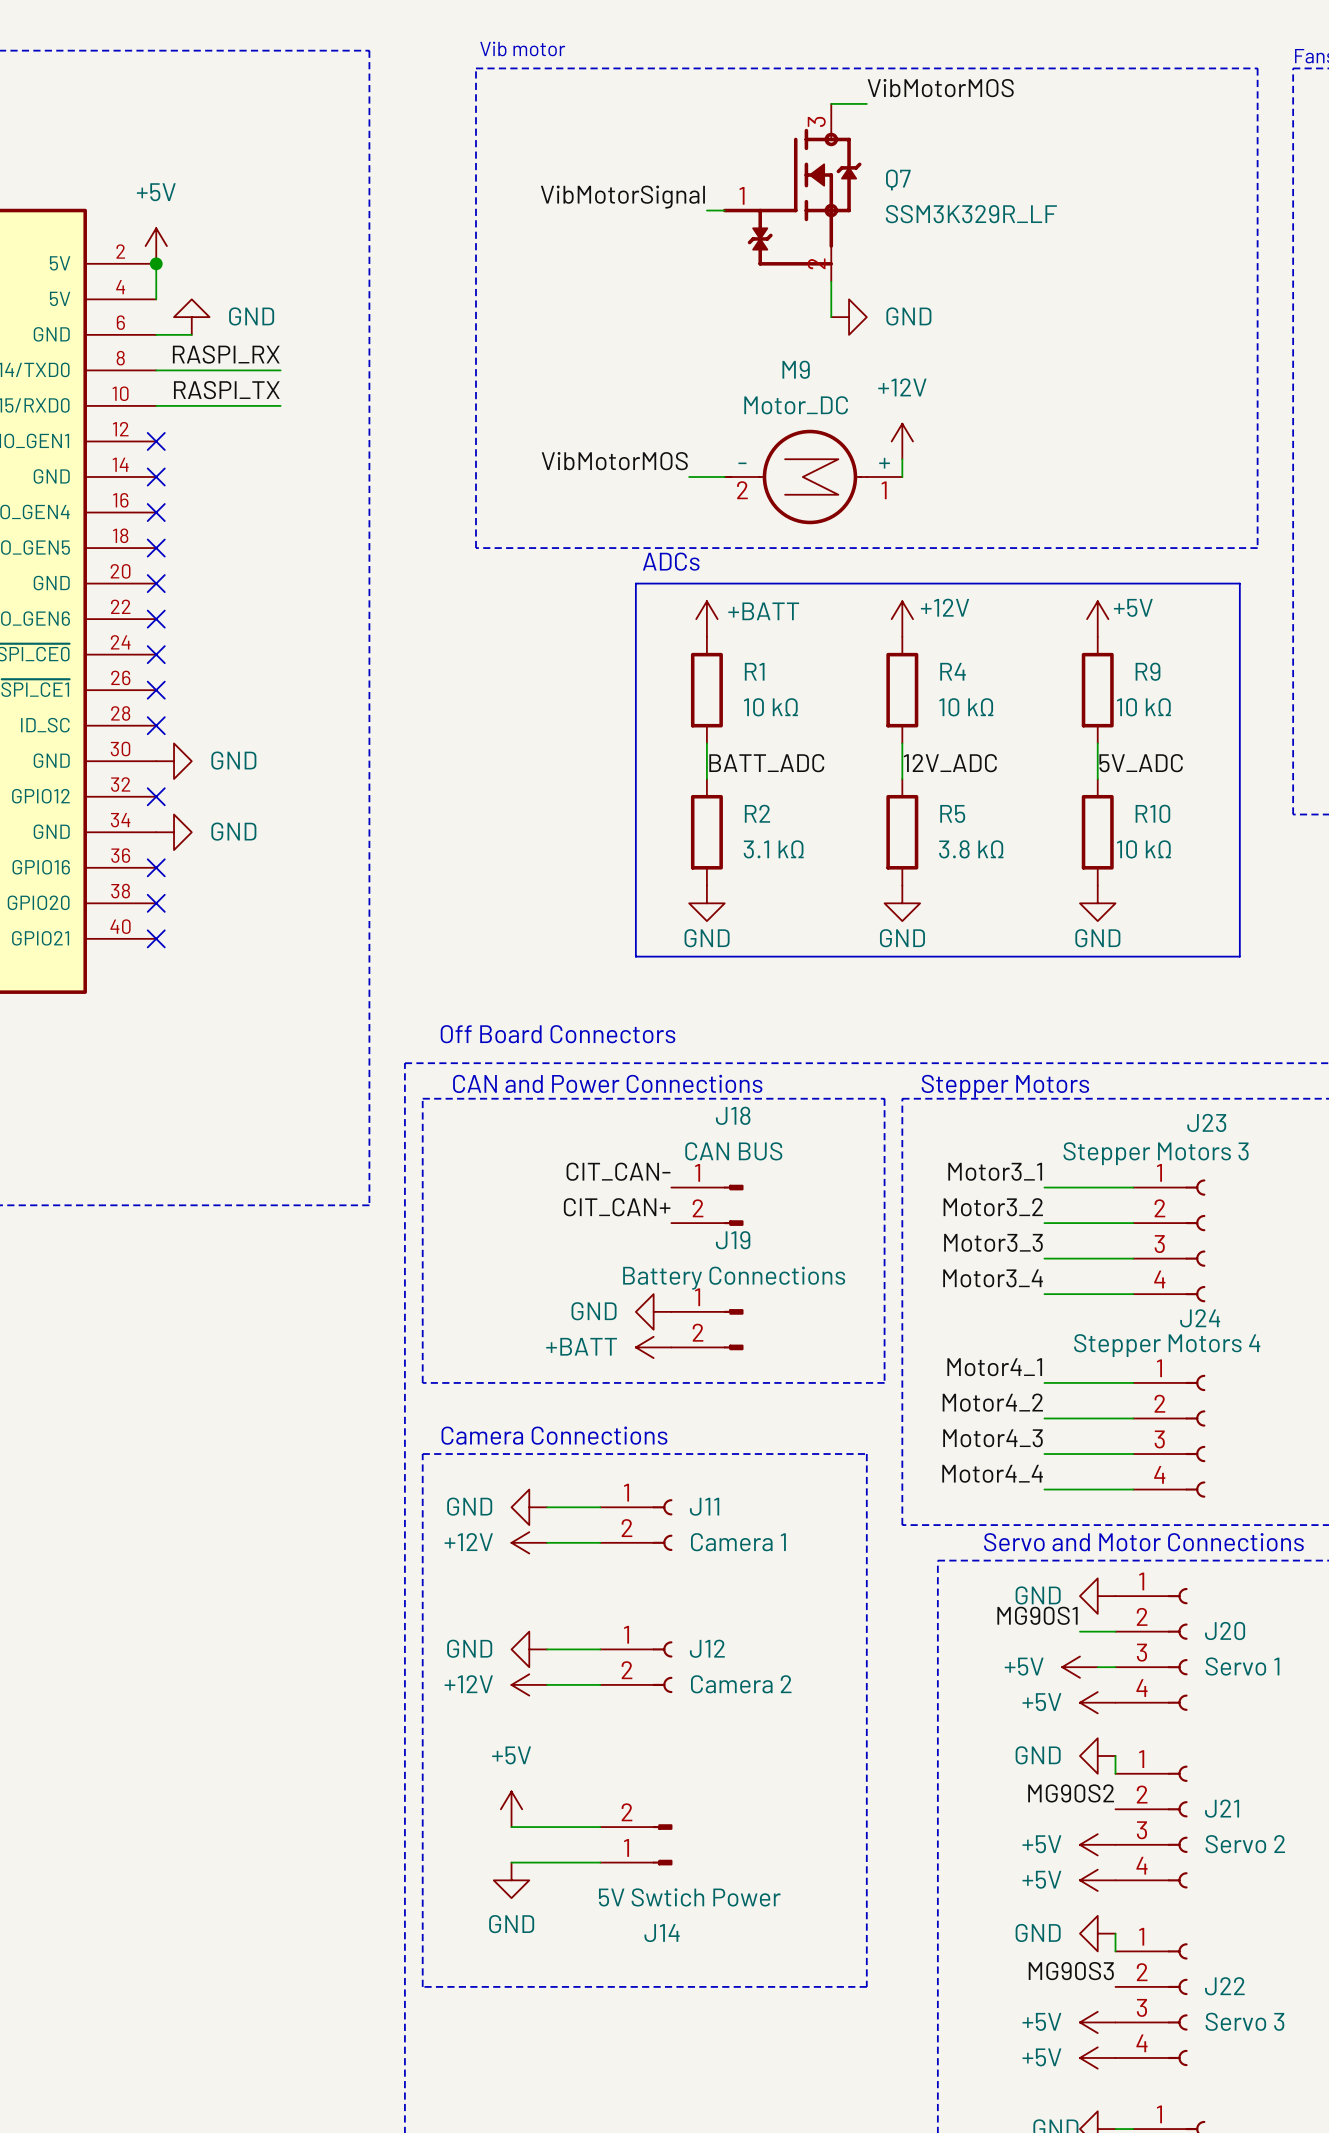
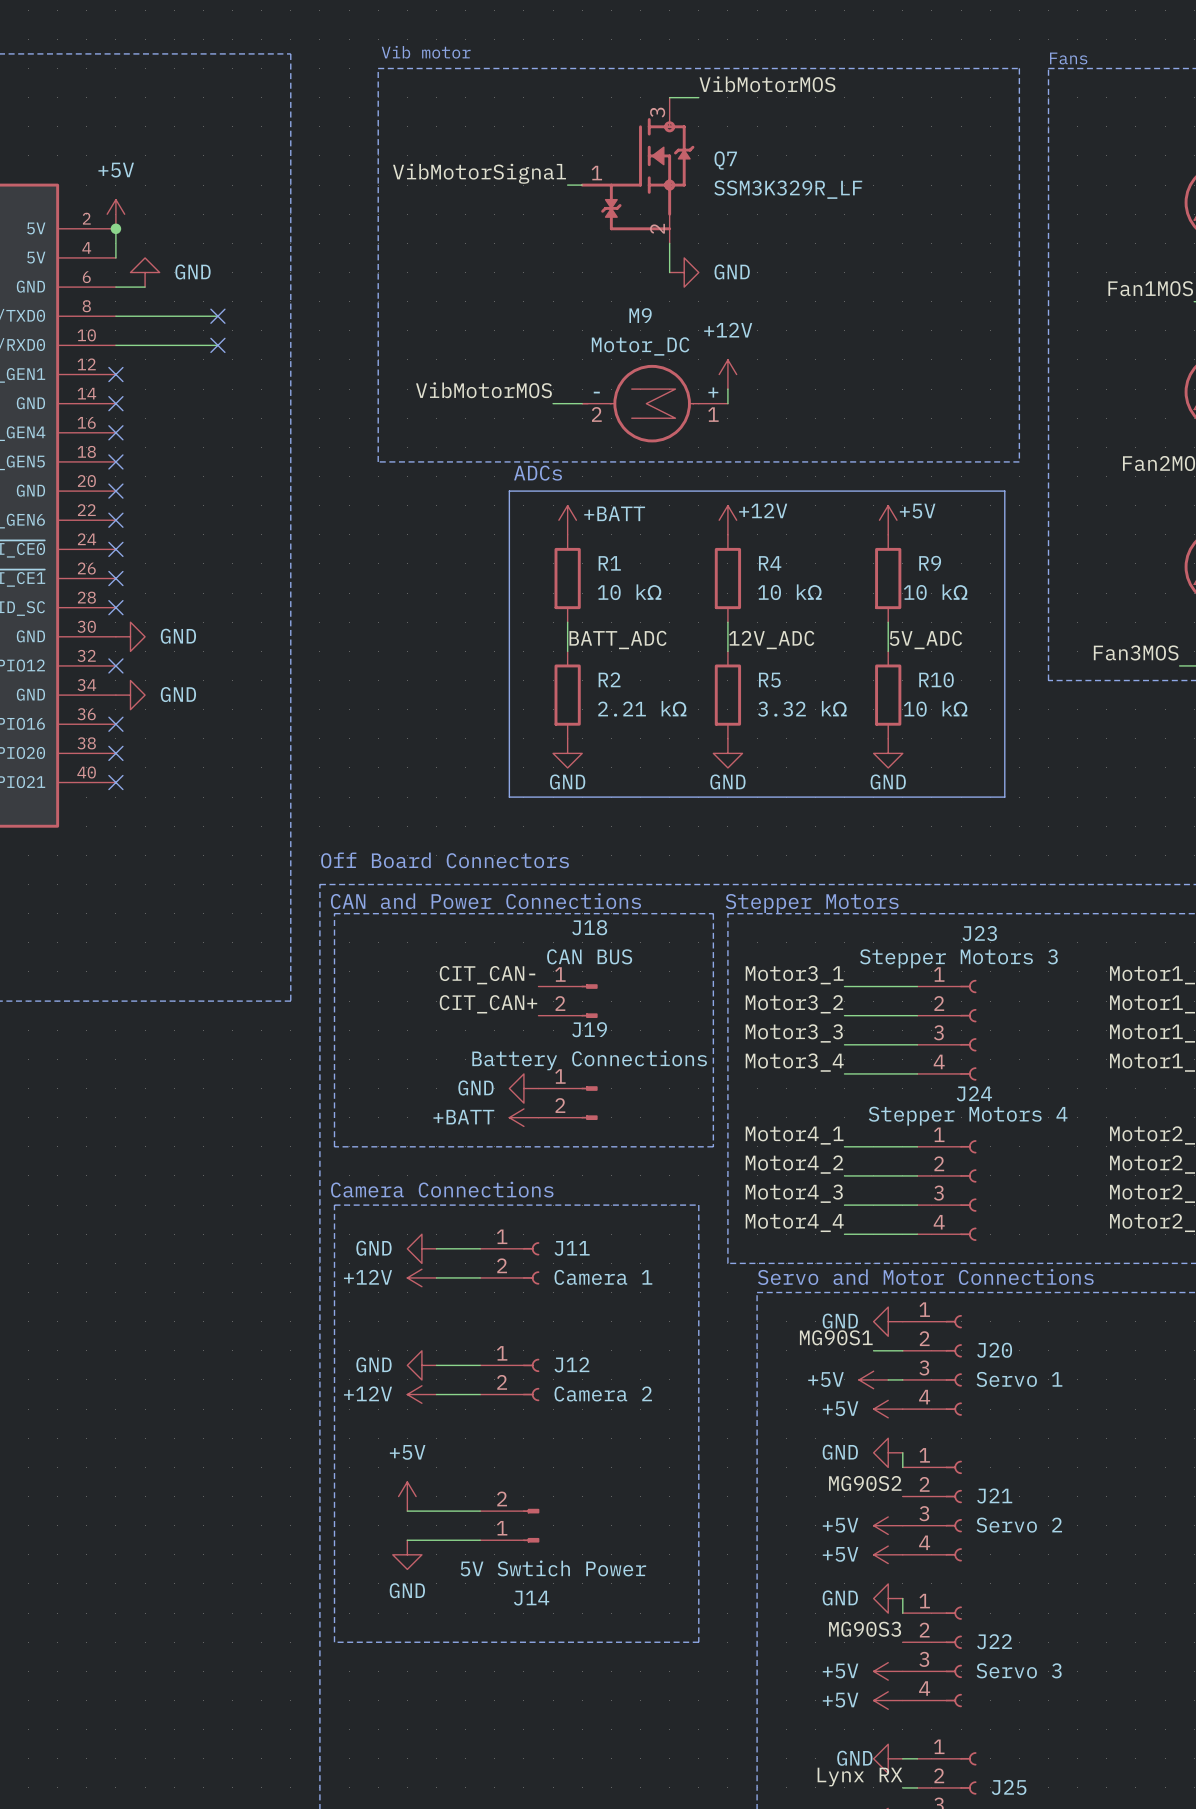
label: RASPI_RX (226, 354) -> none
no-connect mark: none -> (217, 316)
label: RASPI_TX (226, 390) -> none
no-connect mark: none -> (217, 345)
R2 value: 3.1 kΩ (773, 849) -> 2.21 kΩ (642, 708)
R5 value: 3.8 kΩ (971, 849) -> 3.32 kΩ (802, 708)

